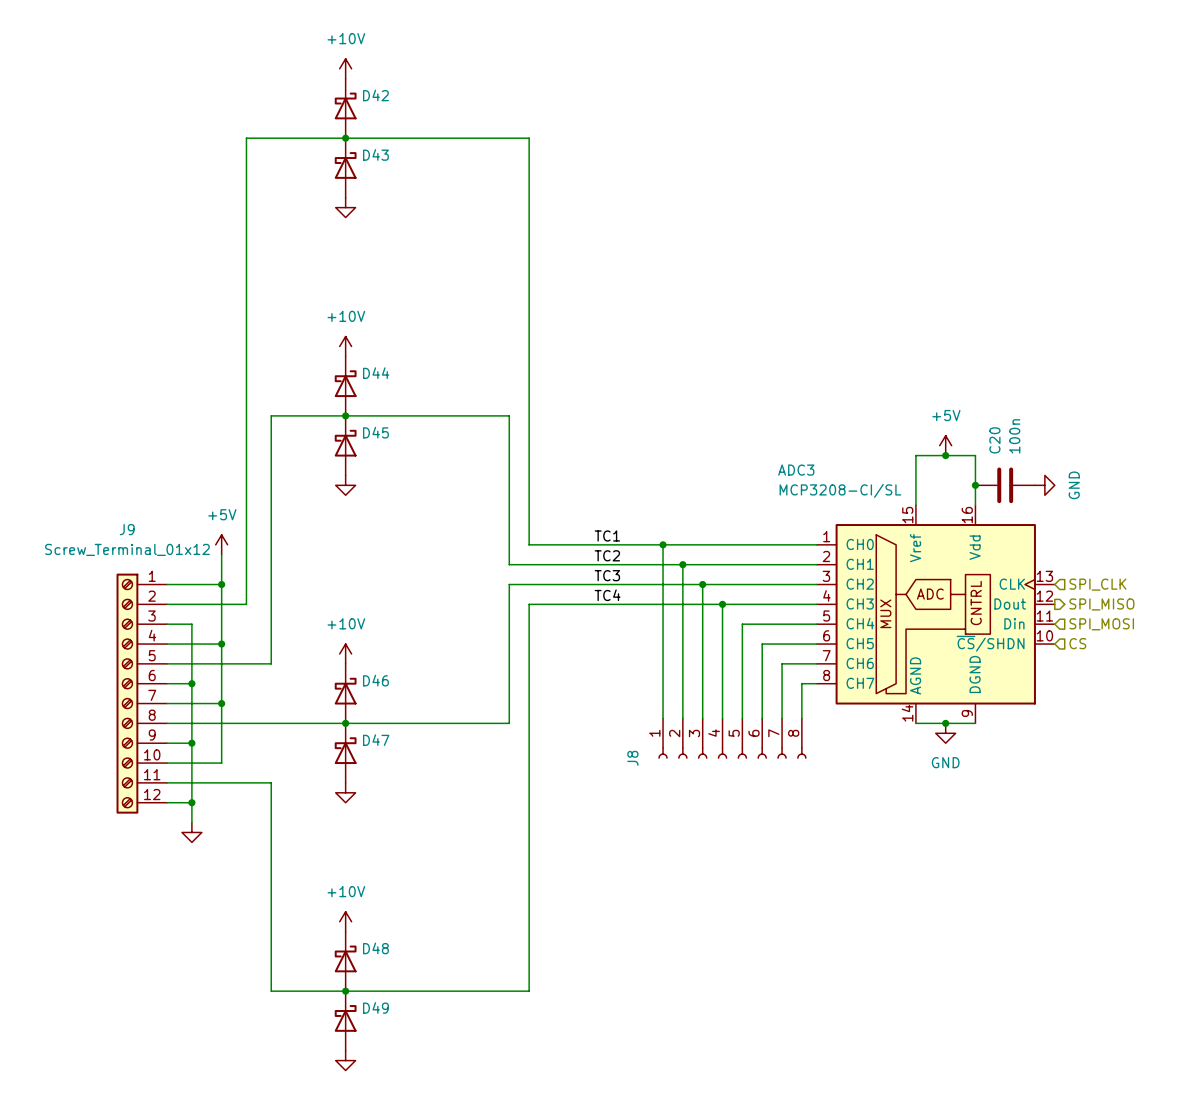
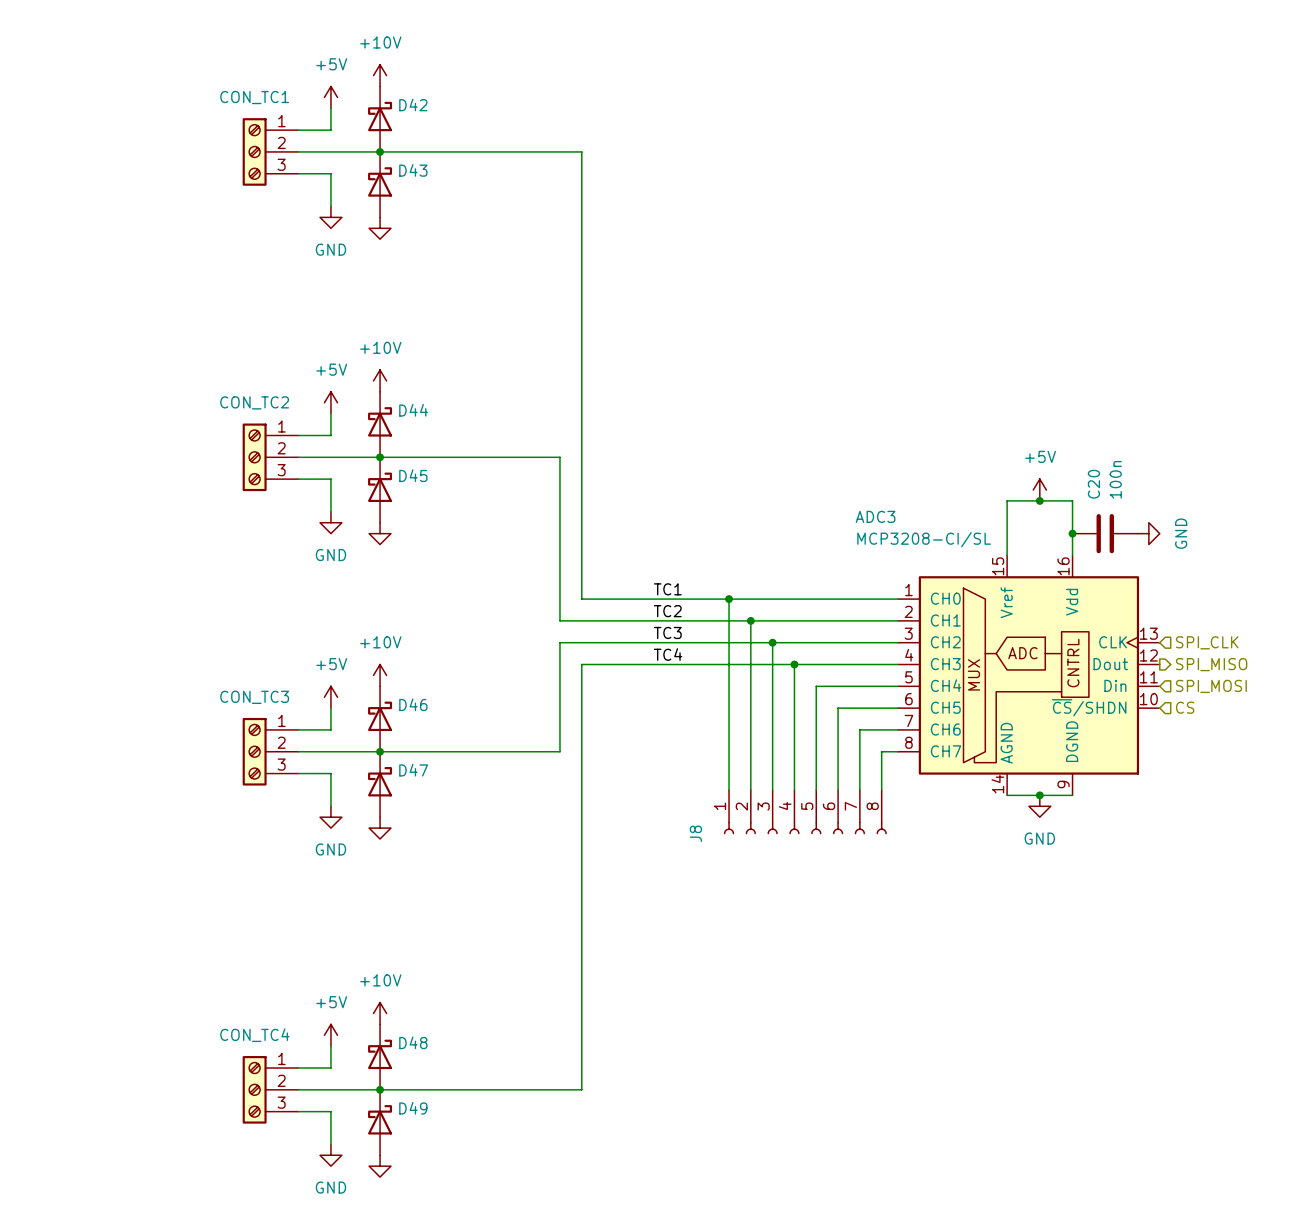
power symbol: none -> +5V (330, 97)
wire: none -> (330, 108) (330, 130) (298, 130)
CON_TC1: none -> (270, 151)
wire: (271, 138) (246, 138) (246, 604) (167, 604) -> none
wire: none -> (298, 173) (330, 173) (330, 206)
power symbol: none -> GND (330, 217)
power symbol: none -> +5V (330, 402)
wire: none -> (330, 413) (330, 435) (298, 435)
CON_TC2: none -> (270, 457)
wire: (271, 415) (271, 663) (167, 663) -> none
wire: none -> (298, 479) (330, 479) (330, 511)
power symbol: none -> GND (330, 522)
power symbol: +5V (221, 544) -> none
wire: (221, 554) (221, 763) (167, 763) -> none
wire: (167, 584) (221, 584) -> none
junction: (221, 584) -> none
wire: (167, 624) (191, 624) (191, 822) -> none
power symbol: none -> +5V (330, 697)
wire: (167, 644) (221, 644) -> none
junction: (221, 644) -> none
wire: none -> (330, 708) (330, 729) (298, 729)
power symbol position: +10V (345, 653) -> +10V (380, 675)
wire: (167, 683) (191, 683) -> none
junction: (191, 683) -> none
CON_TC3: none -> (270, 751)
wire: (509, 683) (509, 723) (167, 723) -> (559, 751) (298, 751)
J9: Screw_Terminal_01x12 (141, 693) -> none
D46 position: (345, 693) -> (380, 719)
wire: (167, 703) (221, 703) -> none
junction: (221, 703) -> none
wire: none -> (298, 773) (330, 773) (330, 806)
junction position: (345, 723) -> (380, 751)
wire: (167, 743) (191, 743) -> none
junction: (191, 743) -> none
power symbol: none -> GND (330, 817)
D47 position: (345, 753) -> (380, 784)
wire: (167, 782) (271, 782) (271, 991) -> none
power symbol position: (345, 792) -> (380, 828)
wire: (167, 802) (191, 802) -> none
junction: (191, 802) -> none
power symbol: (191, 832) -> none
power symbol: none -> +5V (330, 1035)
wire: none -> (330, 1046) (330, 1068) (298, 1068)
CON_TC4: none -> (270, 1089)
wire: none -> (298, 1111) (330, 1111) (330, 1144)
power symbol: none -> GND (330, 1155)

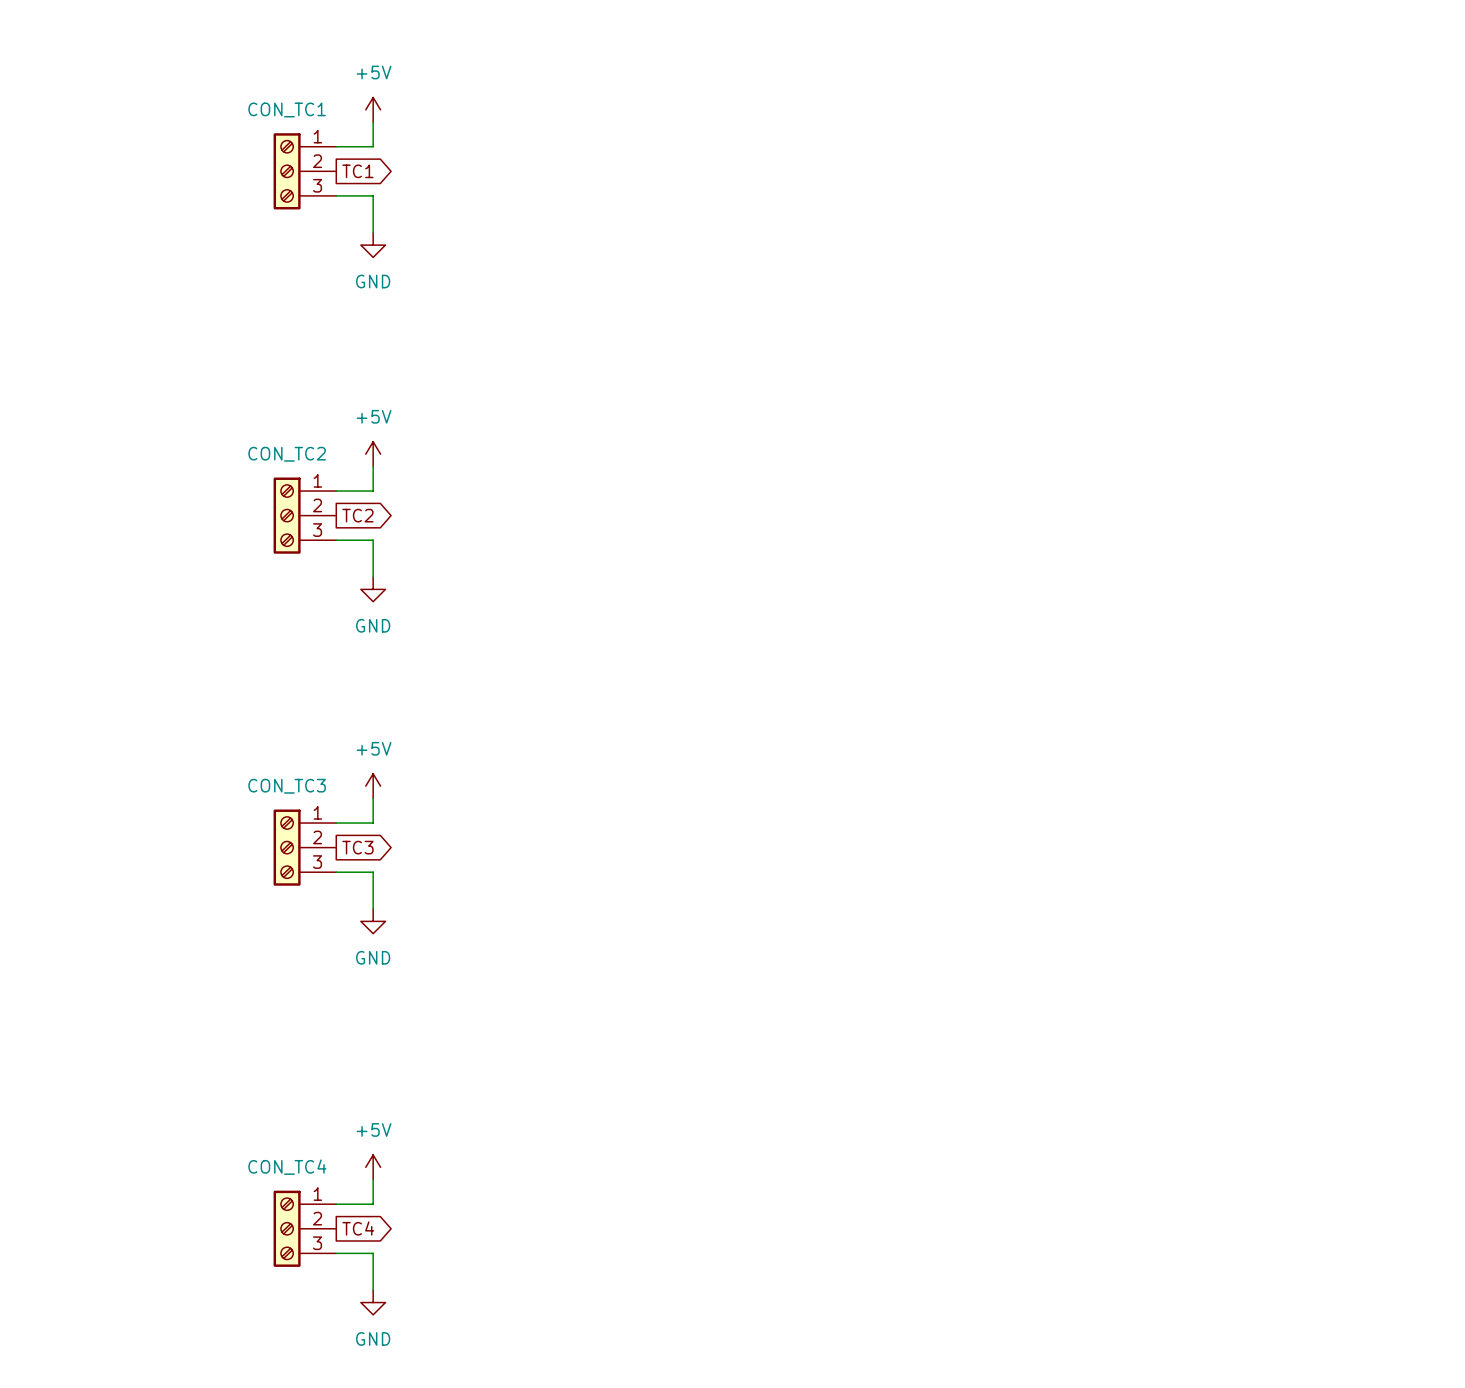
power symbol: +10V (380, 75) -> none
D42: (380, 119) -> none
wire: (298, 151) (581, 151) (581, 599) (898, 599) -> none
global label: none -> TC1 (357, 171)
junction: (380, 151) -> none
D43: (380, 184) -> none
power symbol: (380, 228) -> none
power symbol: +10V (380, 380) -> none
D44: (380, 424) -> none
wire: (298, 457) (559, 457) (559, 620) (898, 620) -> none
global label: none -> TC2 (357, 515)
junction: (380, 457) -> none
D45: (380, 490) -> none
power symbol: +5V (1039, 490) -> none
junction: (1039, 500) -> none
power symbol: (380, 533) -> none
junction: (1072, 533) -> none
C20: 100n (1105, 533) -> none
power symbol: GND (1148, 533) -> none
wire: (1007, 555) (1007, 500) (1072, 500) (1072, 555) -> none
label: TC1 (667, 589) -> none
wire: (729, 599) (729, 789) -> none
junction: (729, 599) -> none
label: TC2 (667, 611) -> none
wire: (750, 620) (750, 789) -> none
junction: (750, 620) -> none
label: TC3 (667, 632) -> none
wire: (772, 642) (772, 789) -> none
junction: (772, 642) -> none
wire: (898, 642) (559, 642) (559, 751) (298, 751) -> none
hierarchical label: SPI_CLK (1207, 642) -> none
label: TC4 (668, 654) -> none
wire: (794, 664) (794, 789) -> none
junction: (794, 664) -> none
wire: (898, 664) (581, 664) (581, 1089) (298, 1089) -> none
hierarchical label: SPI_MISO (1211, 664) -> none
power symbol: +10V (380, 675) -> none
ADC3: MCP3208-CI/SL (1028, 675) -> none
wire: (898, 686) (816, 686) (816, 789) -> none
hierarchical label: SPI_MOSI (1211, 686) -> none
hierarchical label: CS (1185, 707) -> none
wire: (898, 708) (838, 708) (838, 789) -> none
D46: (380, 719) -> none
wire: (898, 729) (859, 729) (859, 789) -> none
global label: none -> TC3 (357, 847)
junction: (380, 751) -> none
wire: (898, 751) (881, 751) (881, 789) -> none
D47: (380, 784) -> none
wire: (1007, 795) (1072, 795) -> none
junction: (1039, 795) -> none
power symbol: GND (1039, 806) -> none
J8: (805, 812) -> none
power symbol: (380, 828) -> none
power symbol: +10V (380, 1013) -> none
D48: (380, 1057) -> none
global label: none -> TC4 (358, 1228)
junction: (380, 1089) -> none
D49: (380, 1122) -> none
power symbol: (380, 1166) -> none

